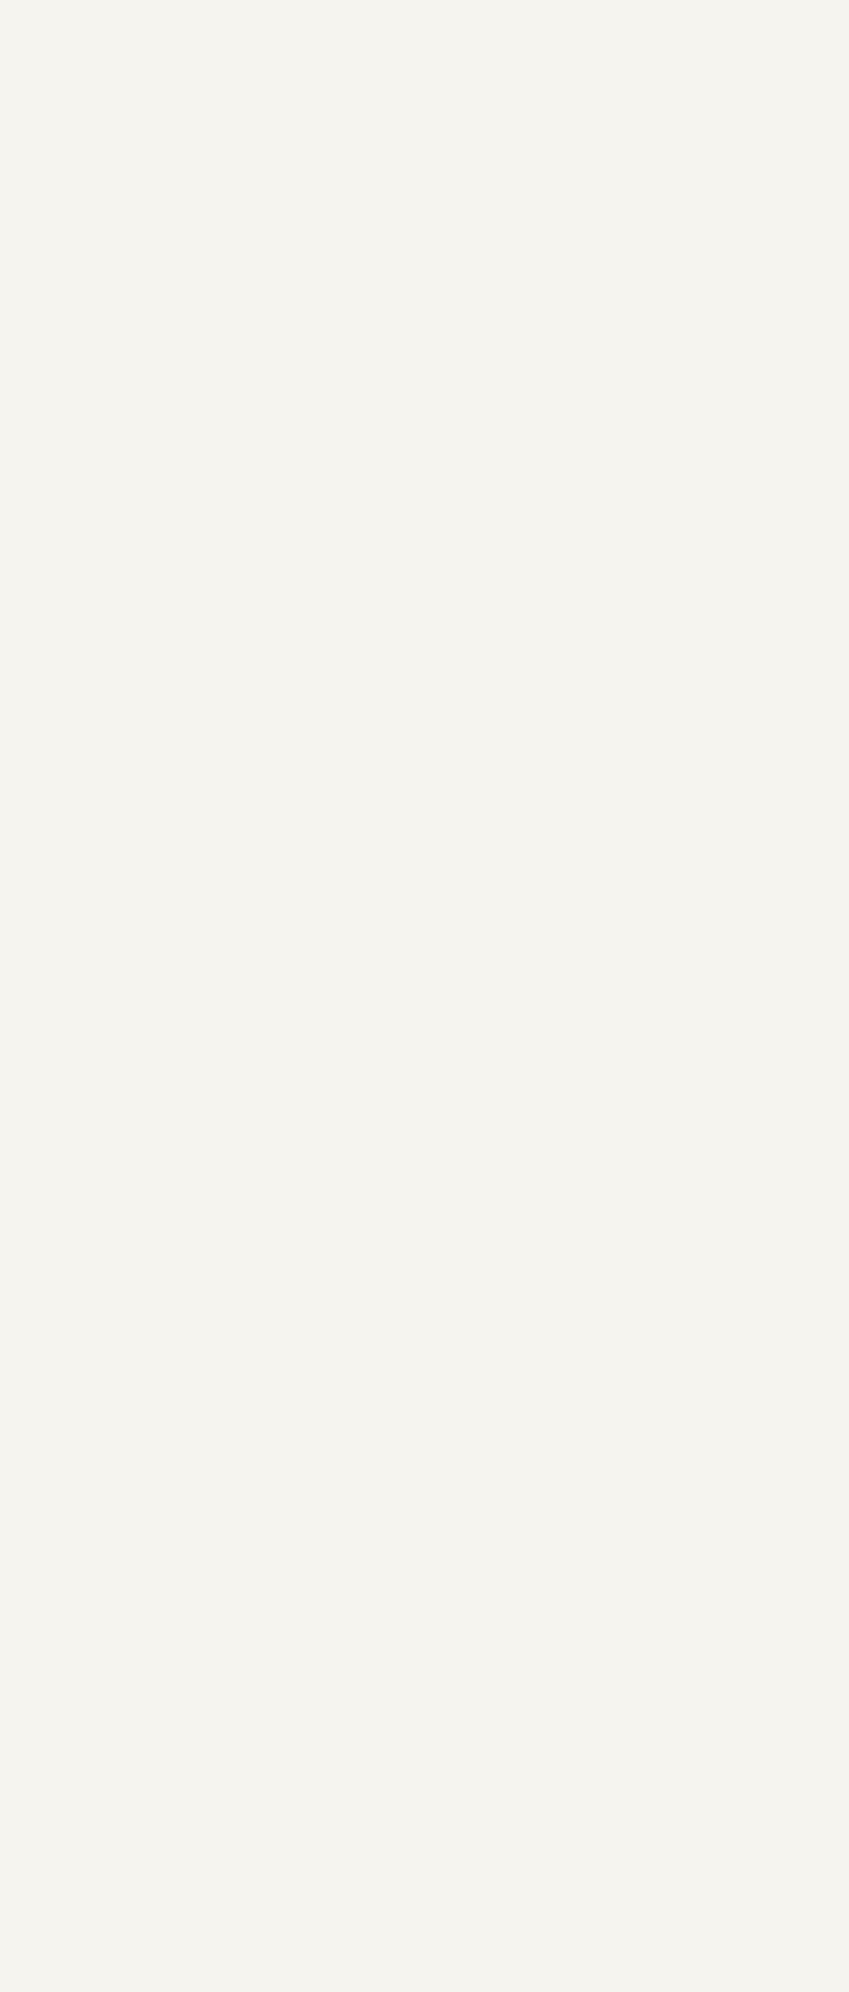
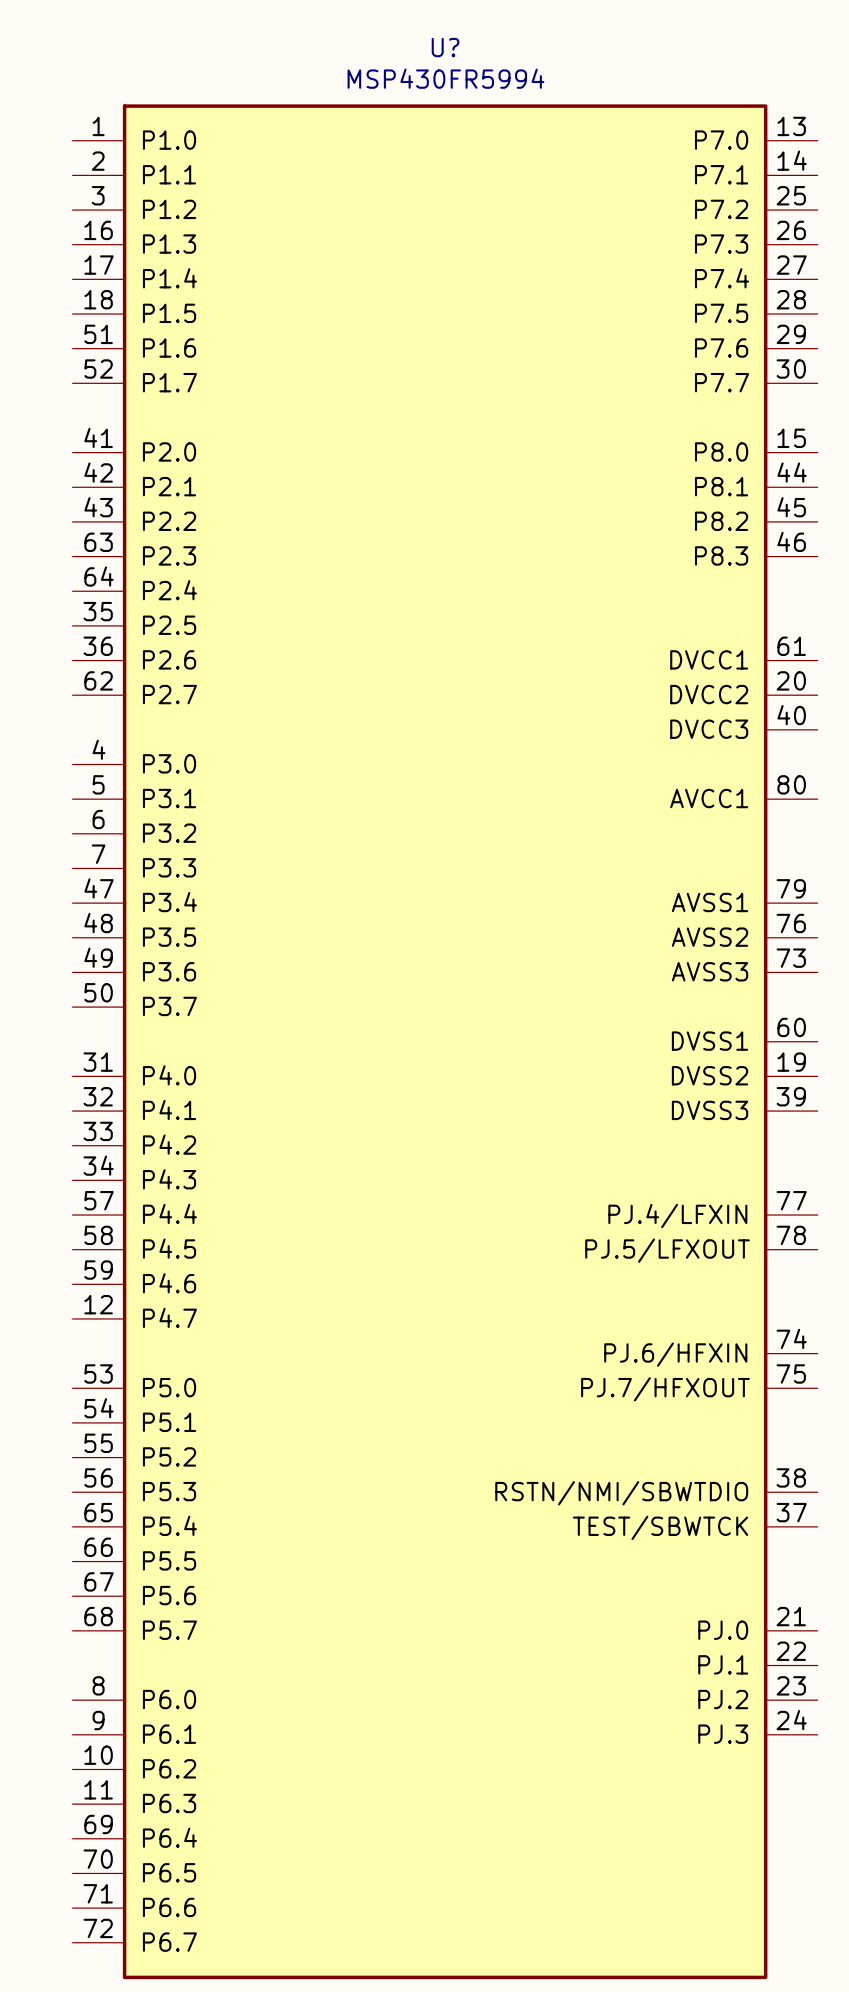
U?: none -> MSP430FR5994 (445, 1041)

